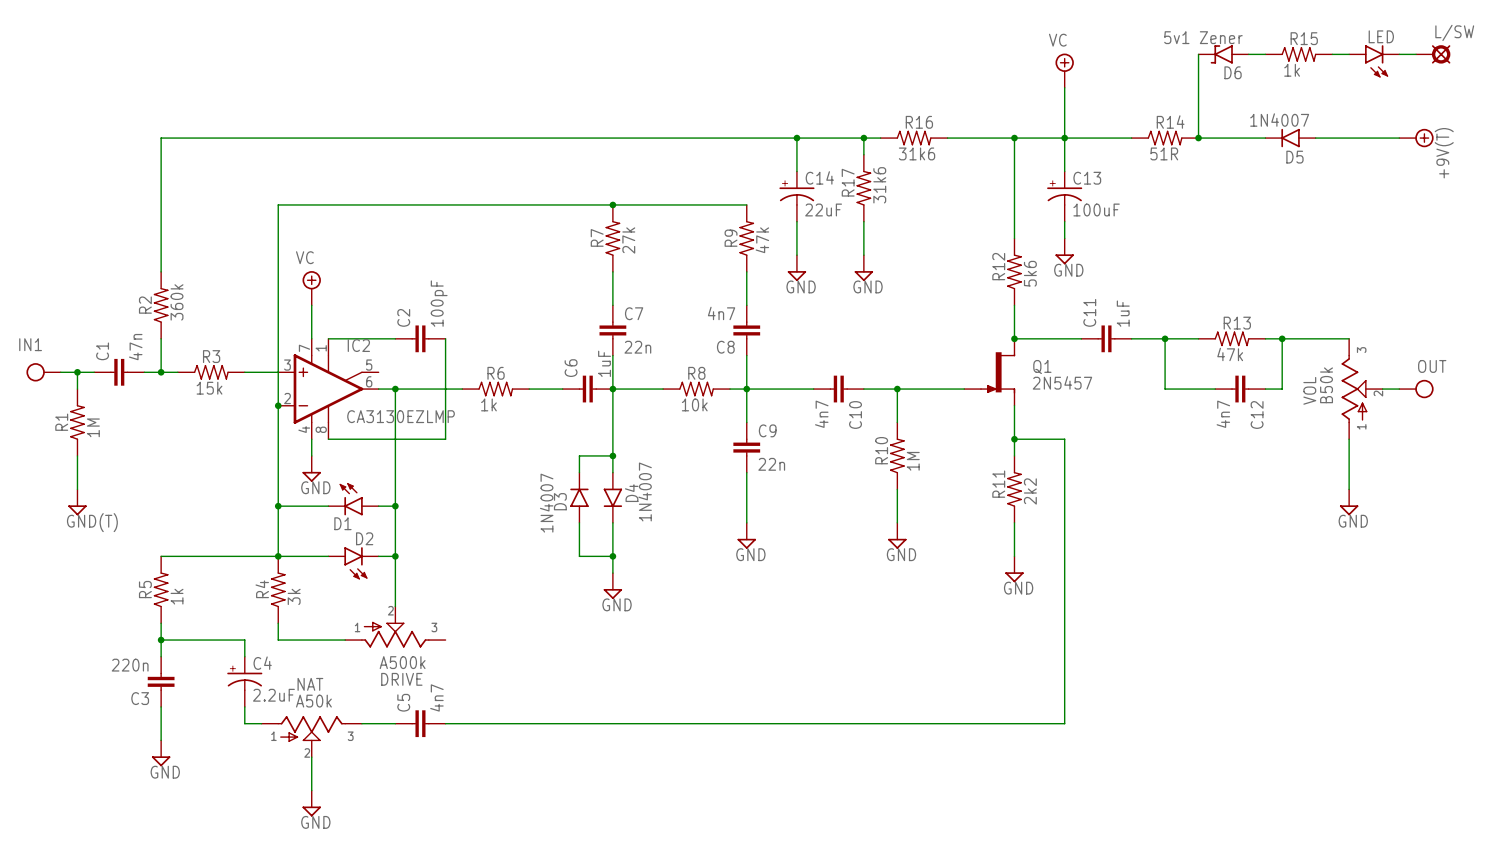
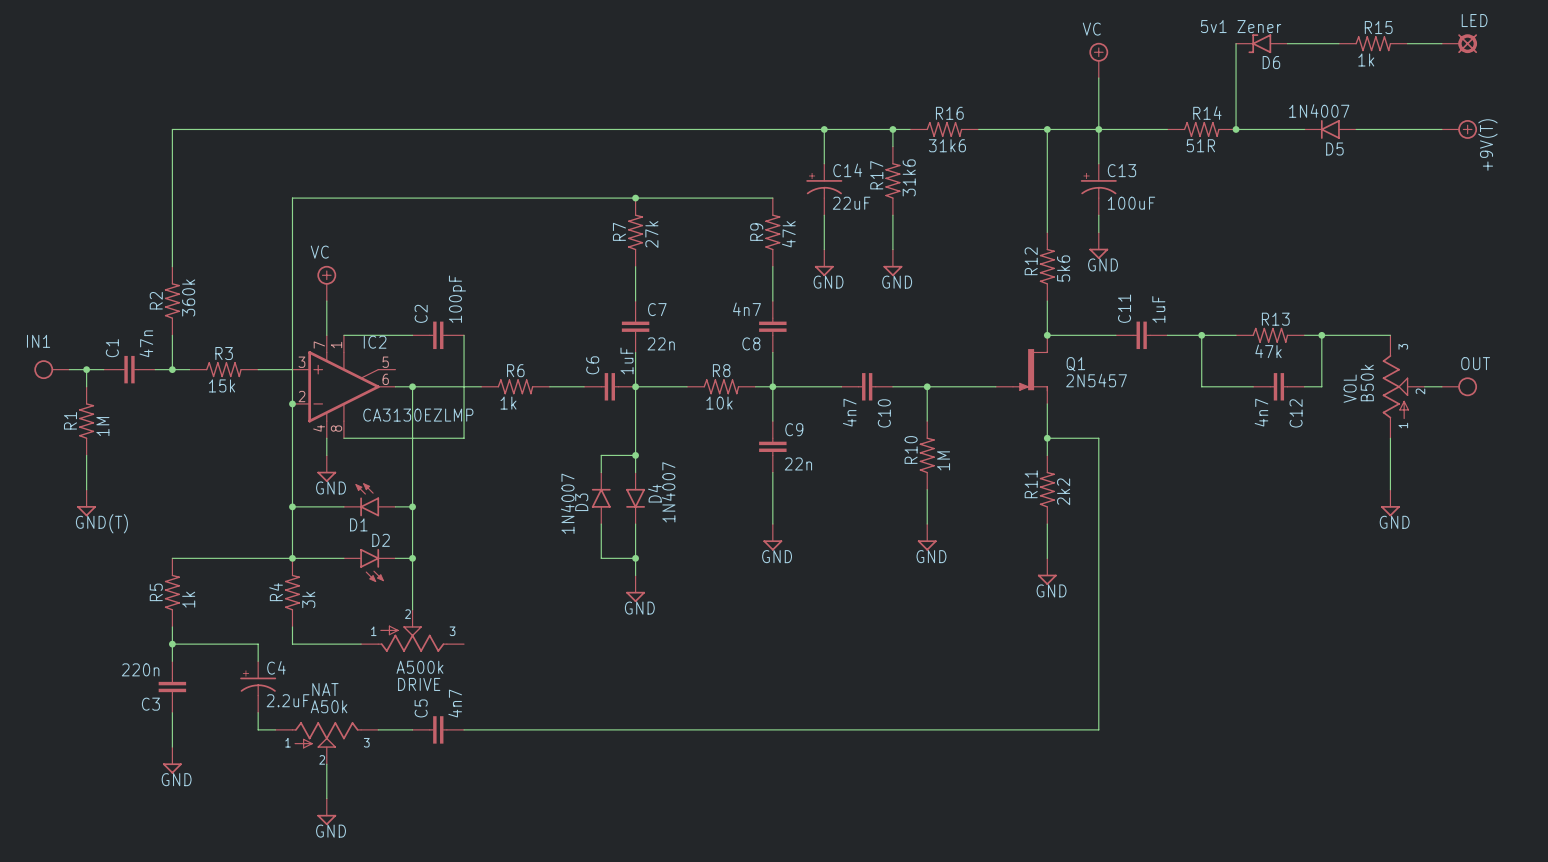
R15 position: (1298, 54) -> (1373, 43)
wire: (1332, 54) (1349, 54) -> none
LED: none -> (1459, 43)
L/SW: (1433, 54) -> none
LED: (1374, 61) -> none

